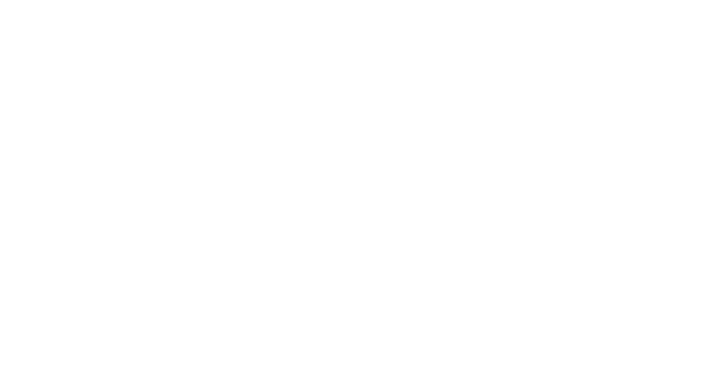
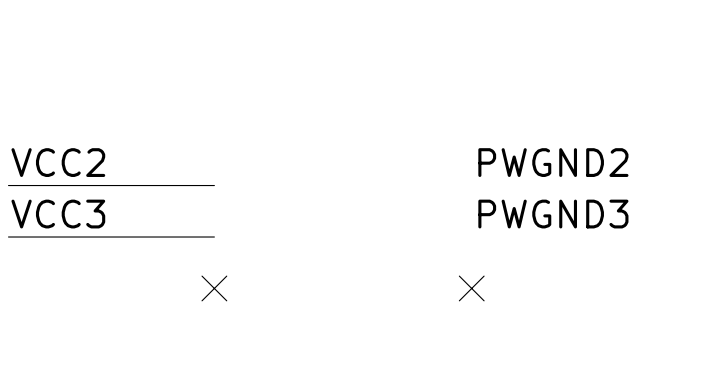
label: none -> VCC2 (58, 162)
label: none -> PWGND2 (553, 162)
wire: none -> (8, 185) (214, 185)
label: none -> VCC3 (58, 214)
label: none -> PWGND3 (553, 214)
wire: none -> (8, 237) (214, 237)
no-connect mark: none -> (214, 288)
no-connect mark: none -> (471, 288)

